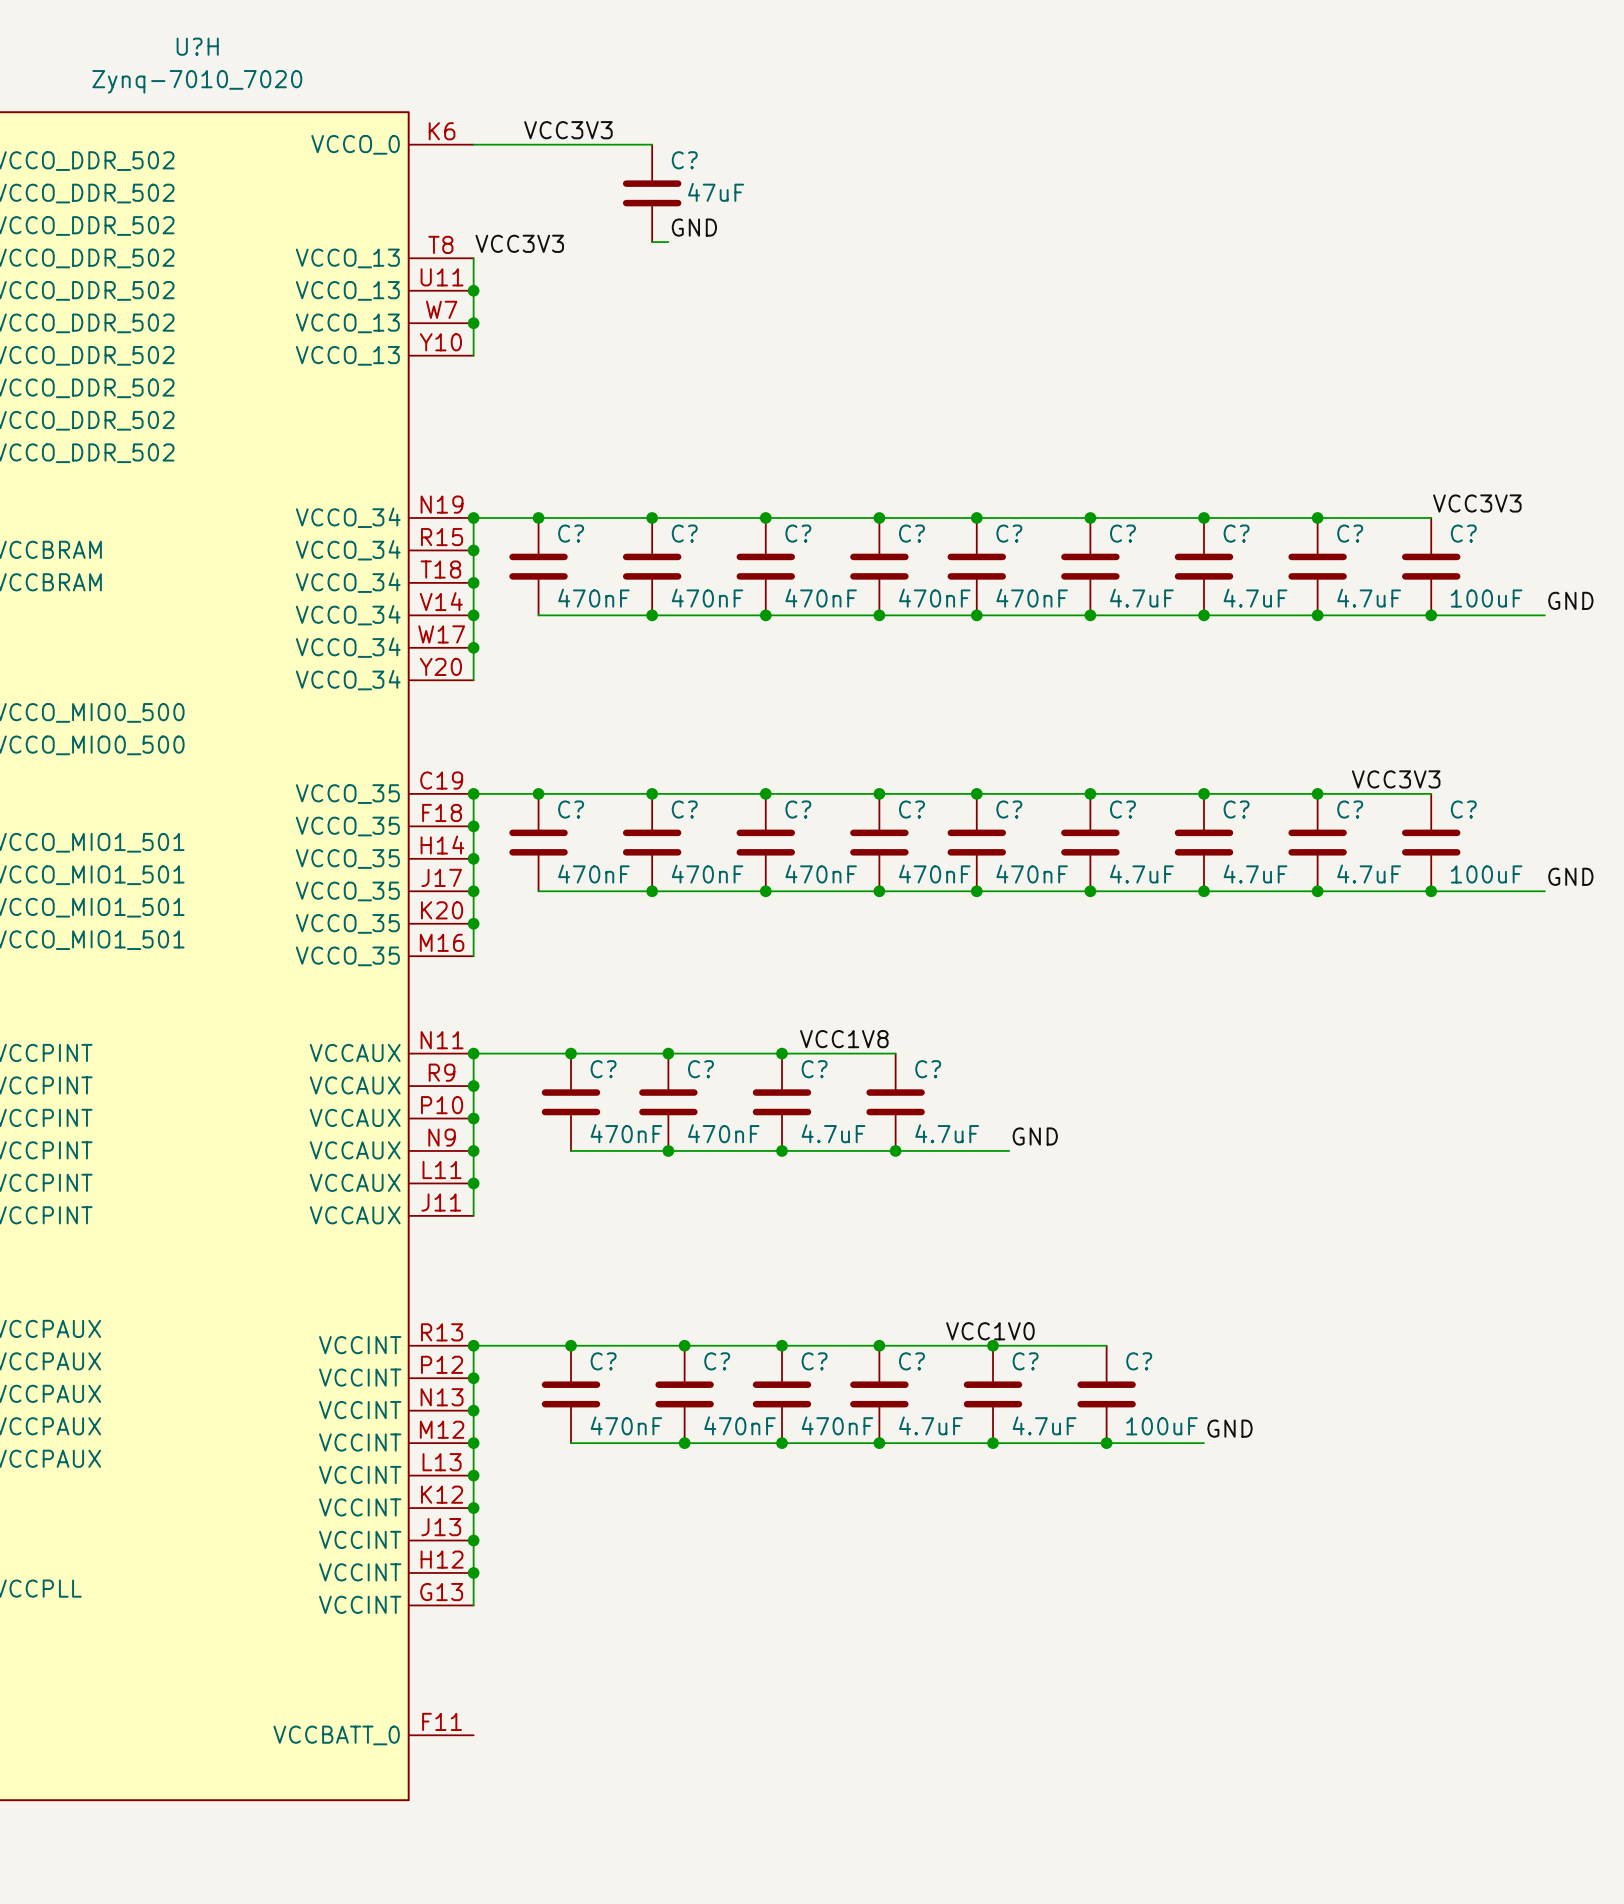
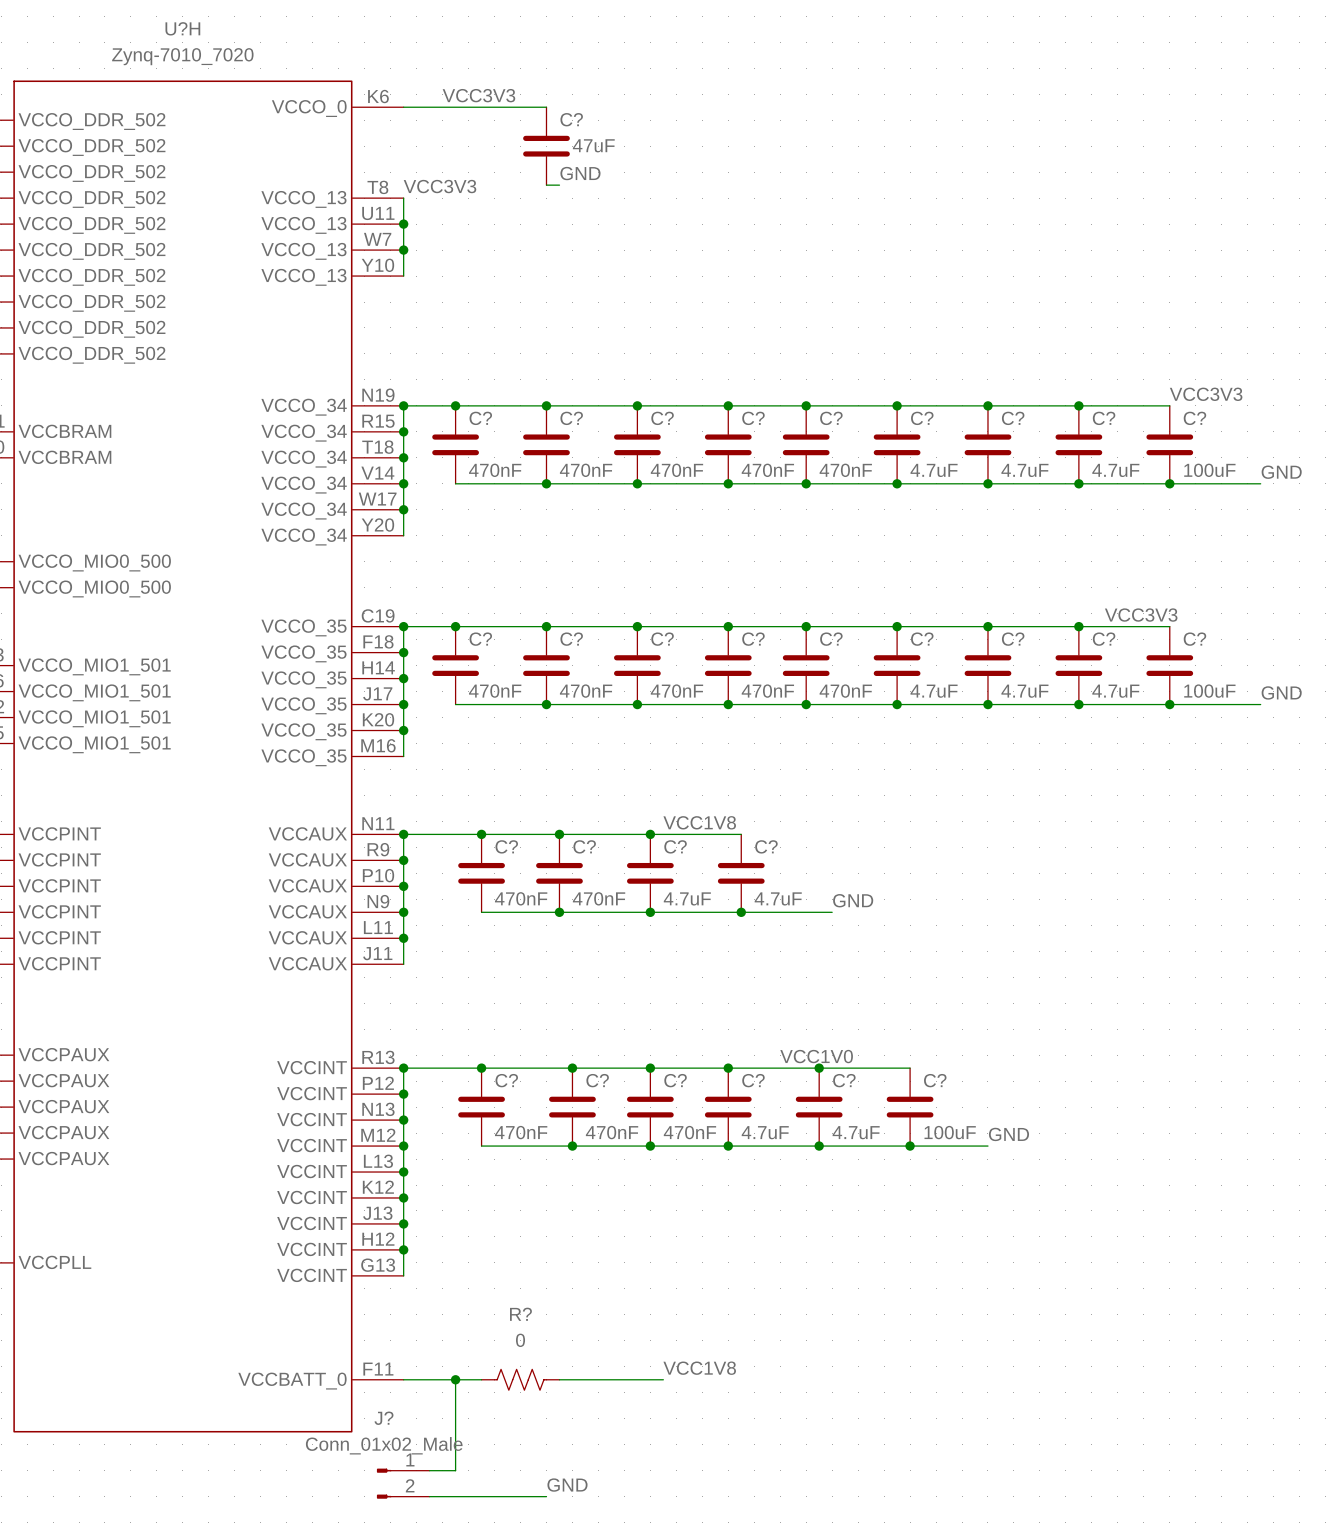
label: none -> VCC1V8 (699, 1368)
wire: none -> (403, 1379) (481, 1379)
wire: none -> (455, 1379) (455, 1470) (429, 1470)
junction: none -> (455, 1379)
R?: none -> 0 (520, 1379)
wire: none -> (559, 1379) (663, 1379)
J?: none -> Conn_01x02_Male (403, 1483)
label: none -> GND (567, 1485)
wire: none -> (429, 1496) (546, 1496)

